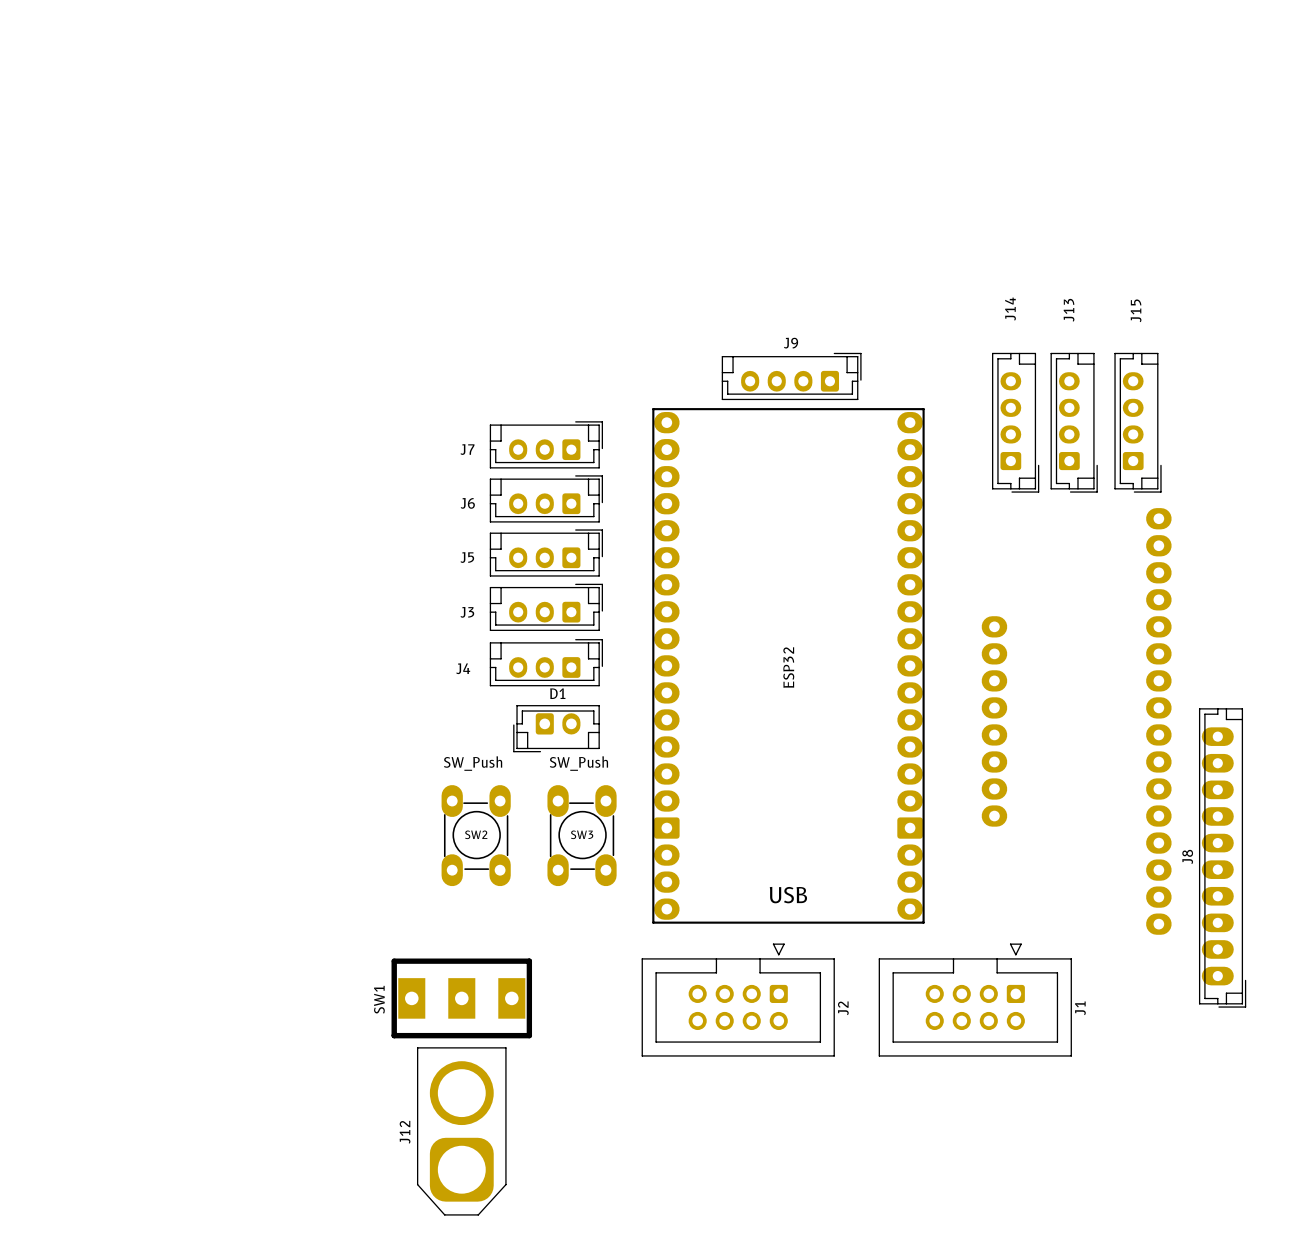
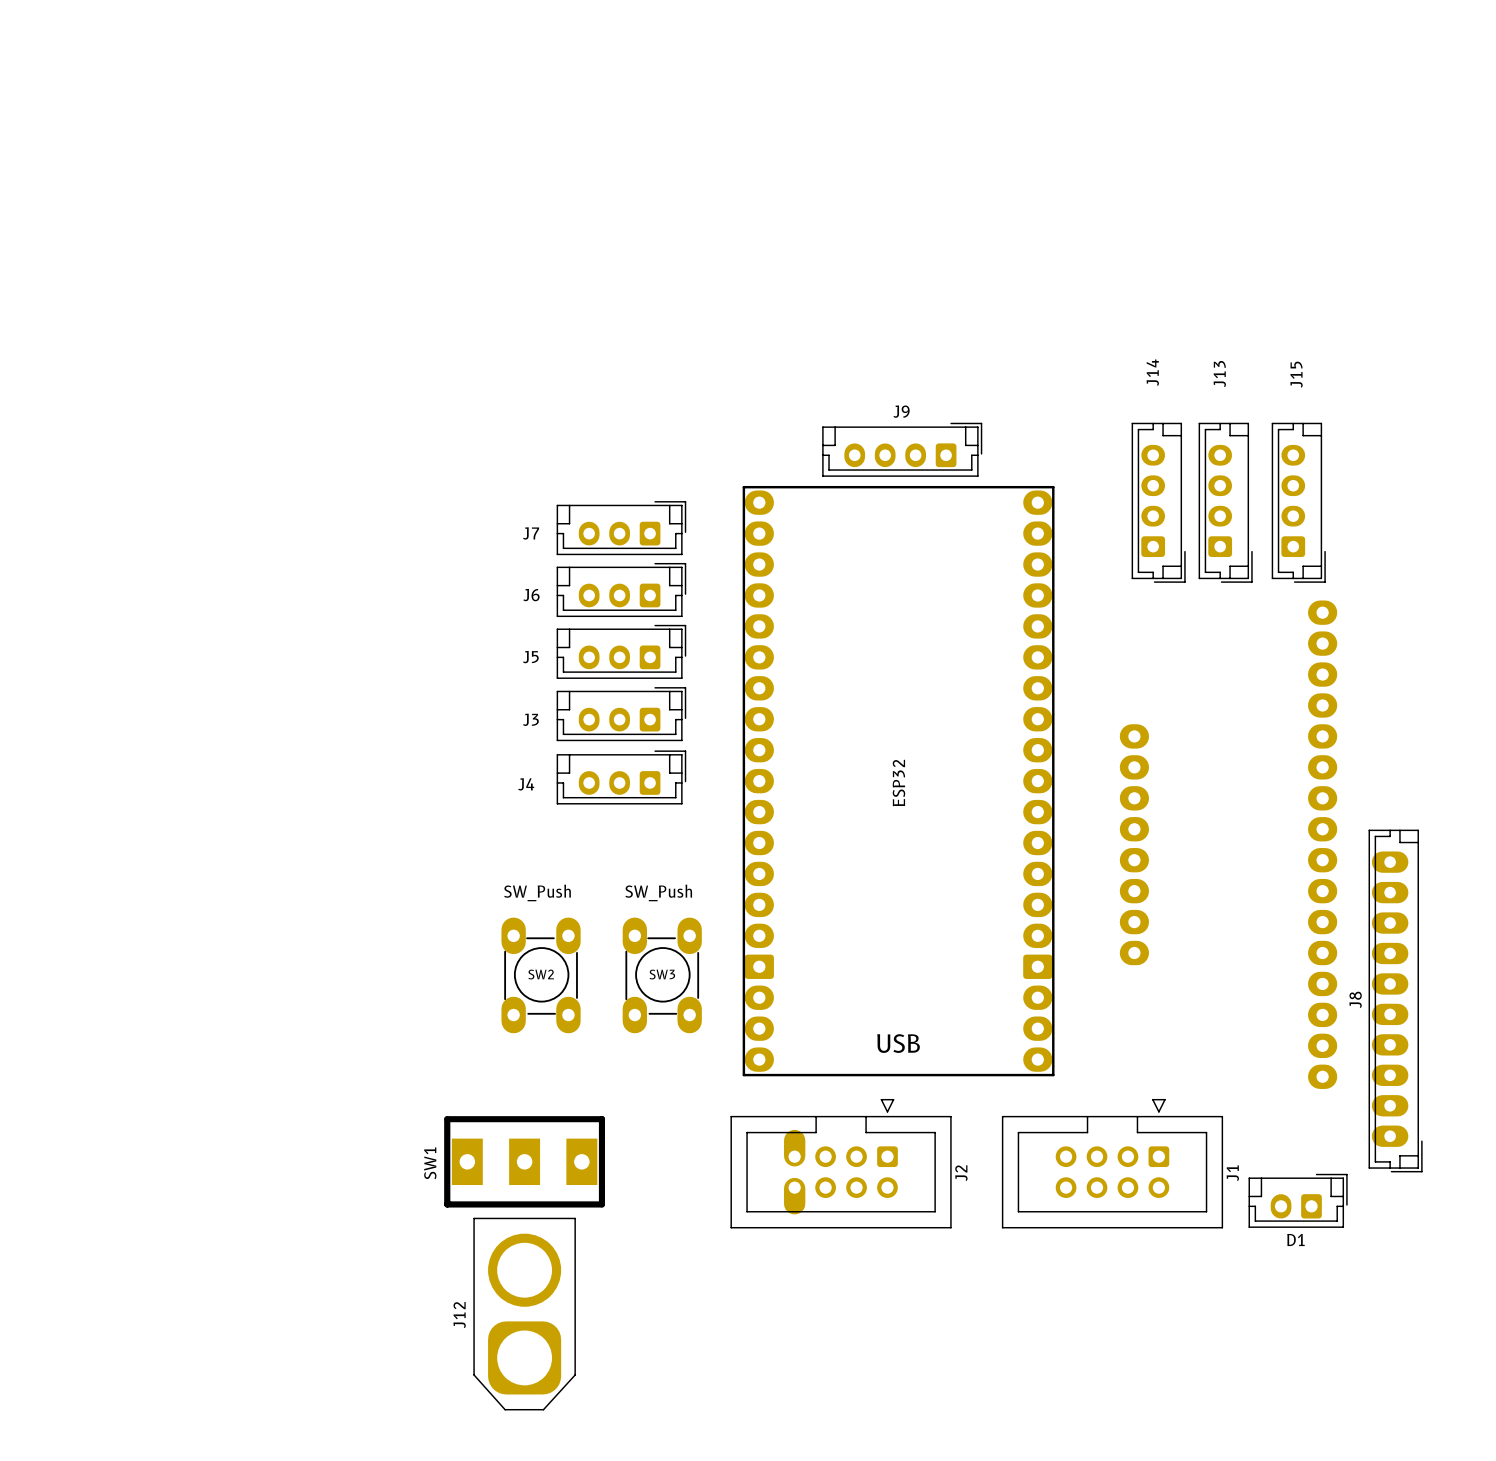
D1 rotation: 0° (556, 728) -> 180° (1298, 1200)
D1 position: (556, 728) -> (1298, 1200)
J2 footprint: [641, 943, 835, 1057] -> [730, 1098, 952, 1229]

